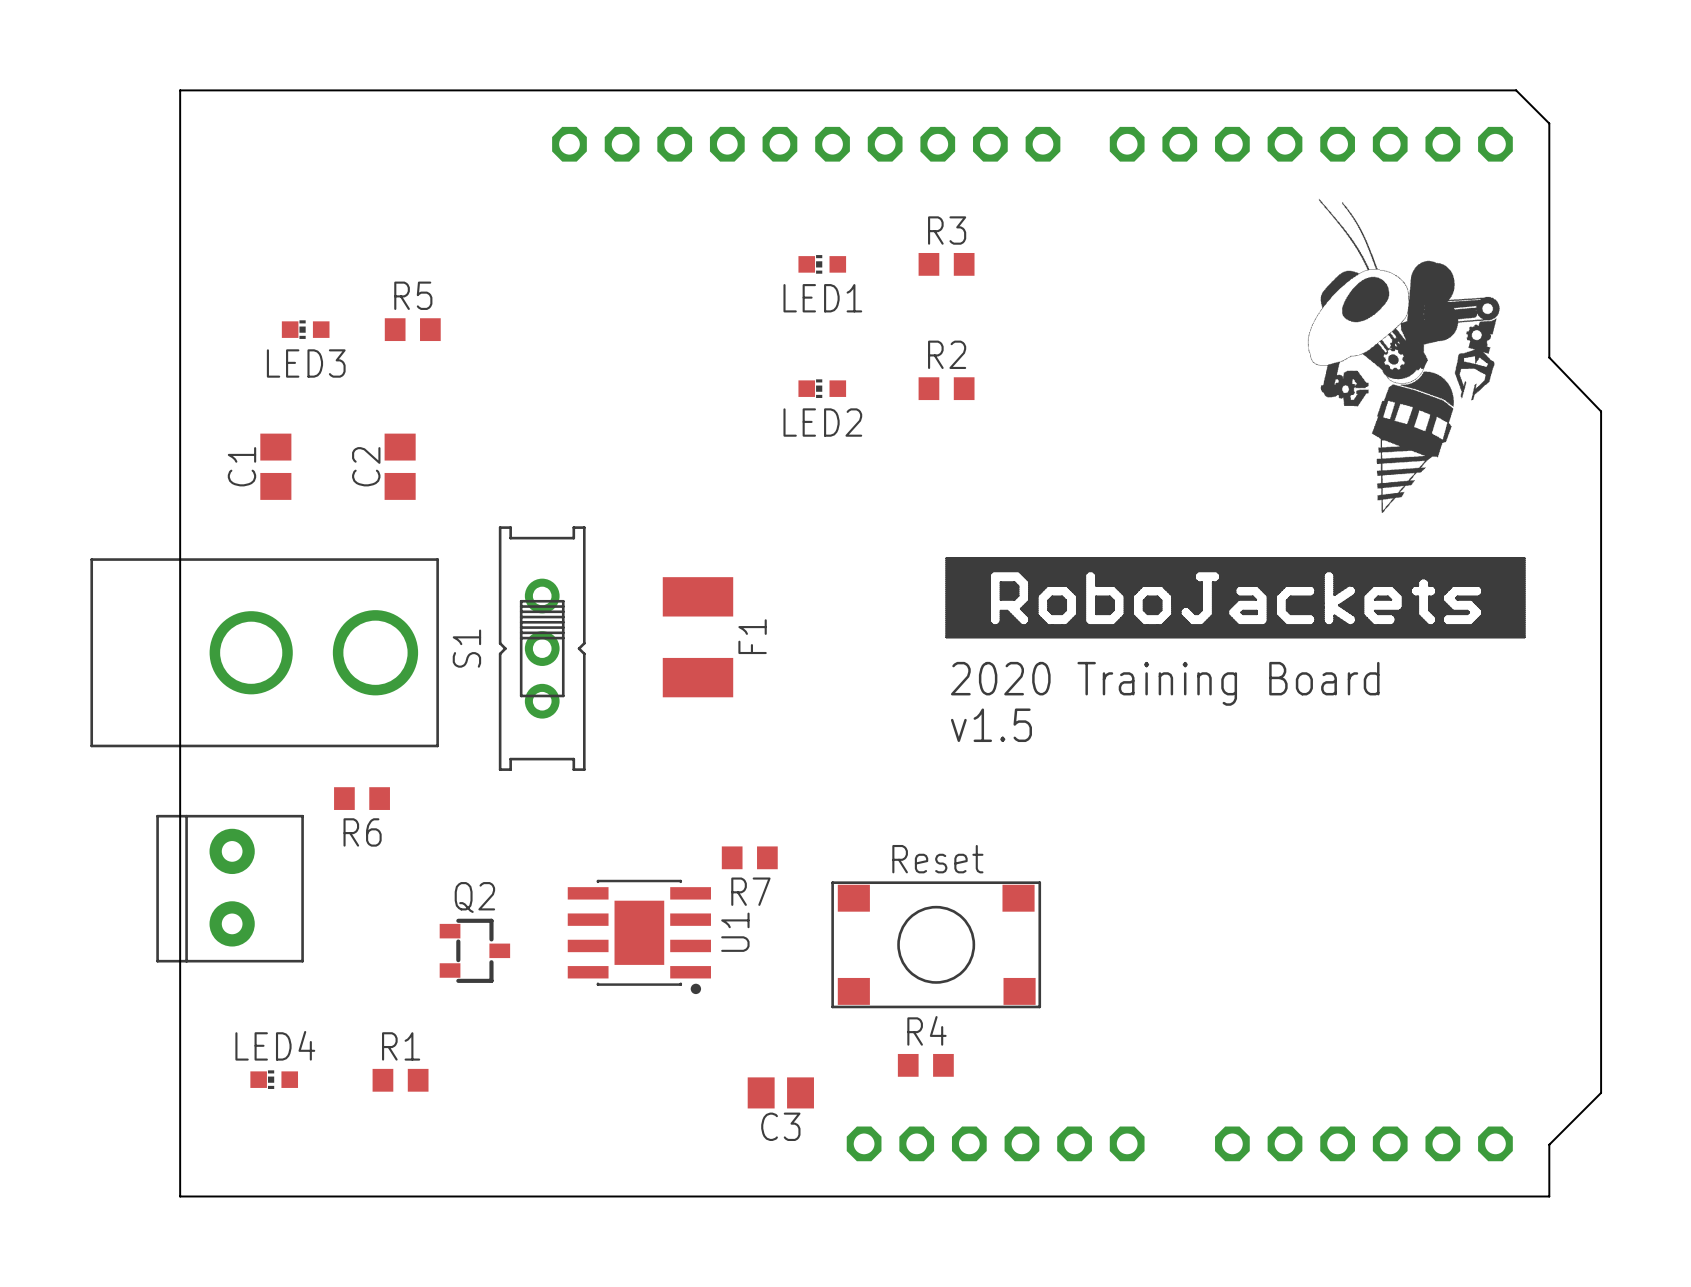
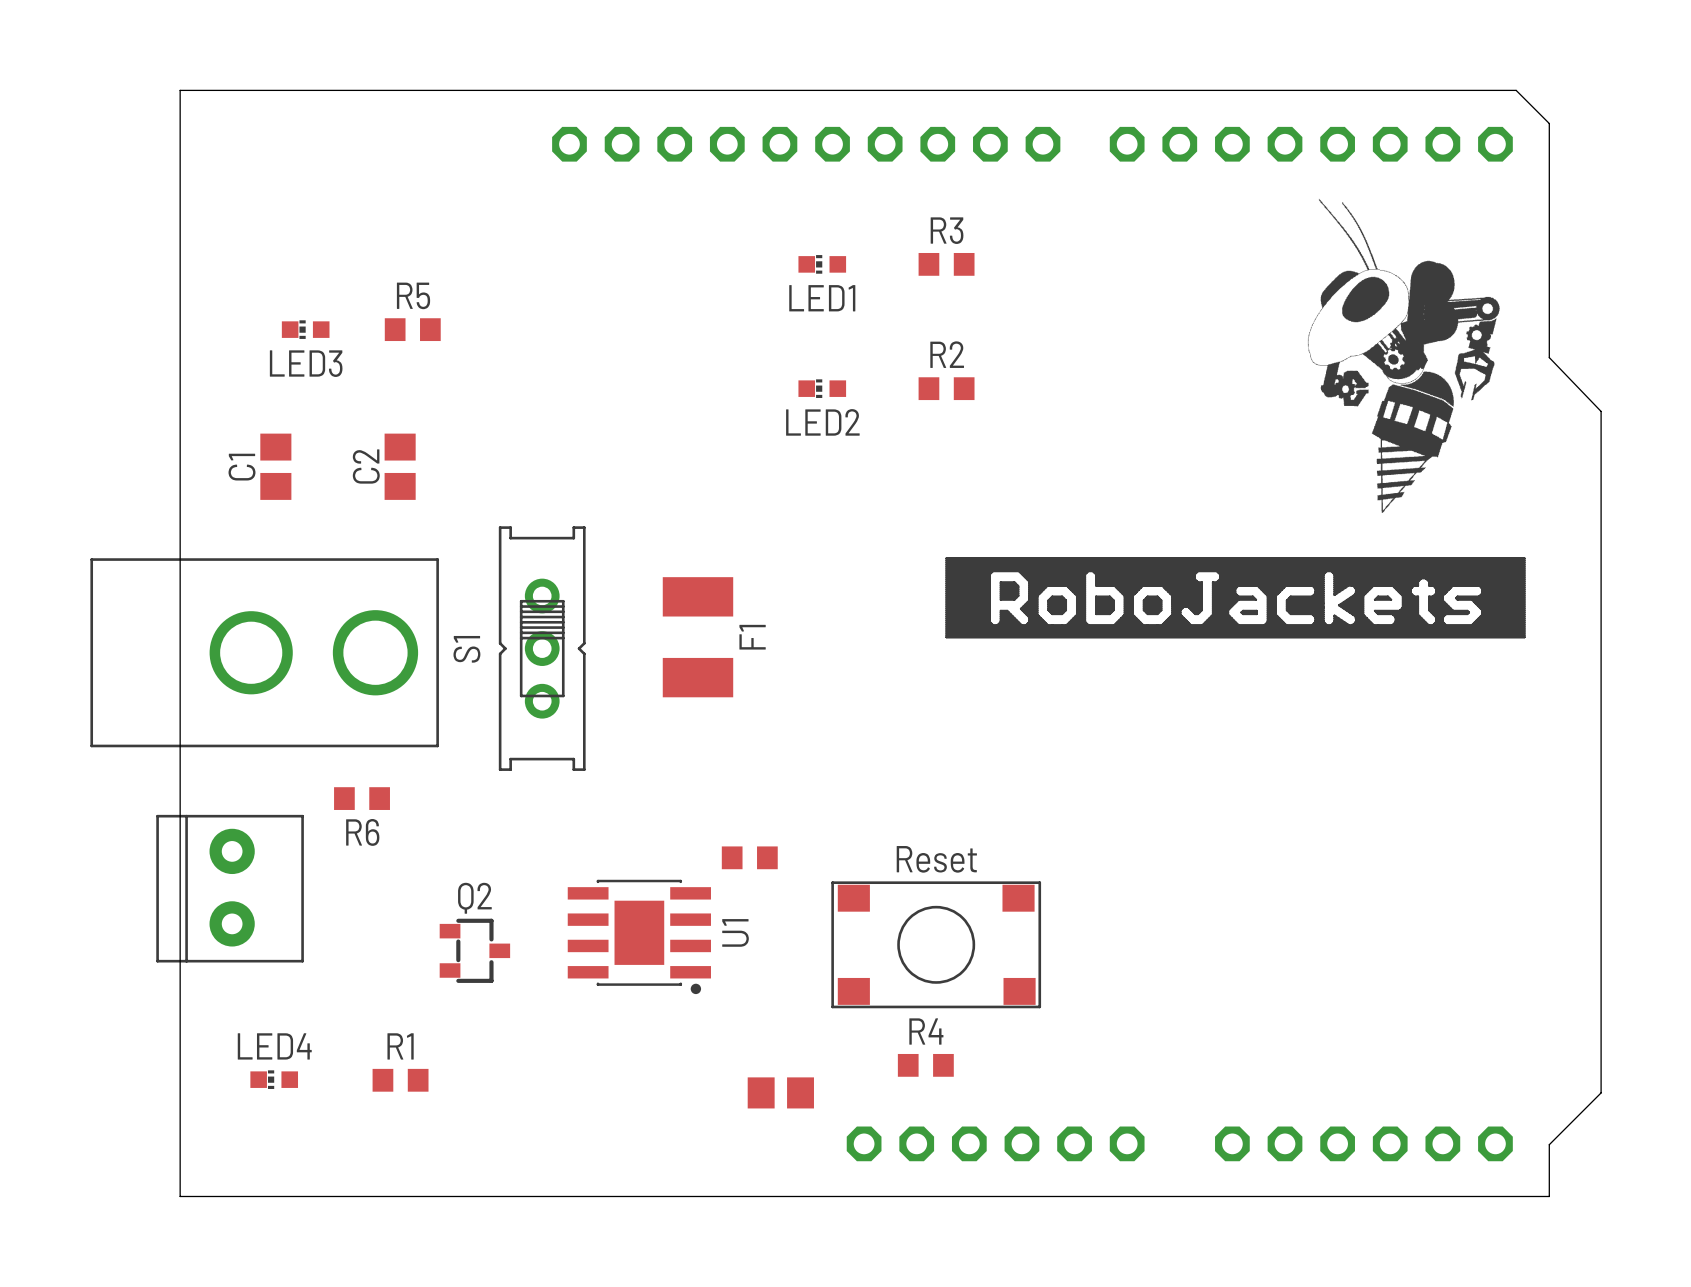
text: 2020 Training Board (1165, 683) -> none
text: v1.5 (991, 725) -> none
R7 name: R7 (750, 891) -> none
C3 name: C3 (780, 1126) -> none

